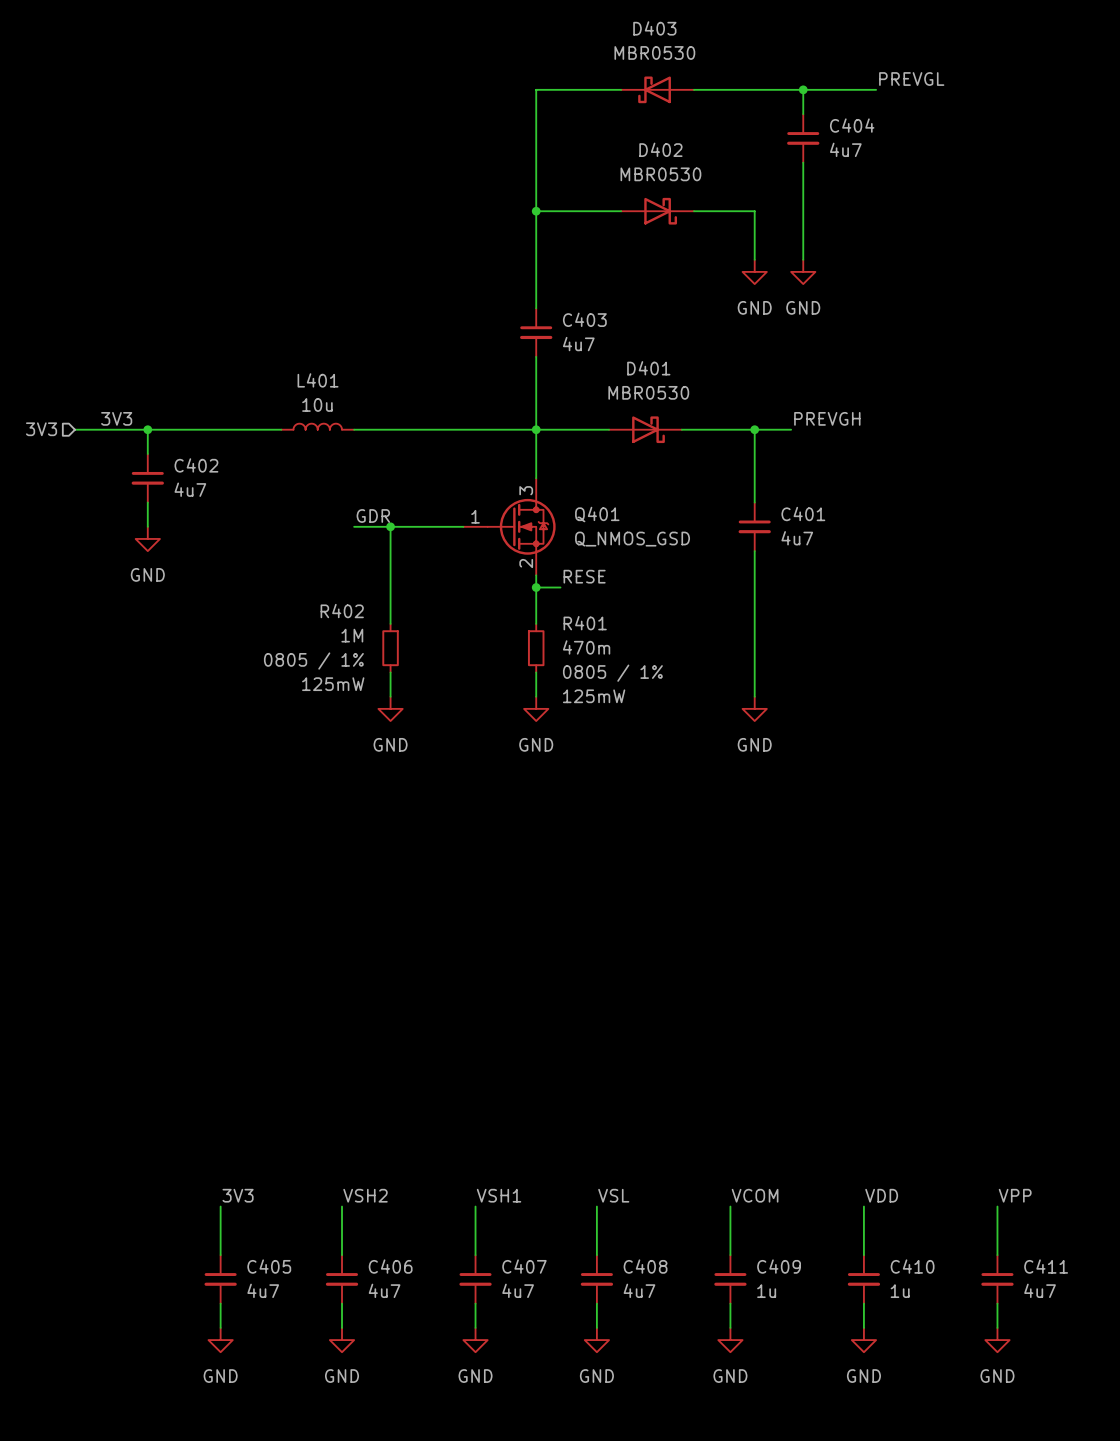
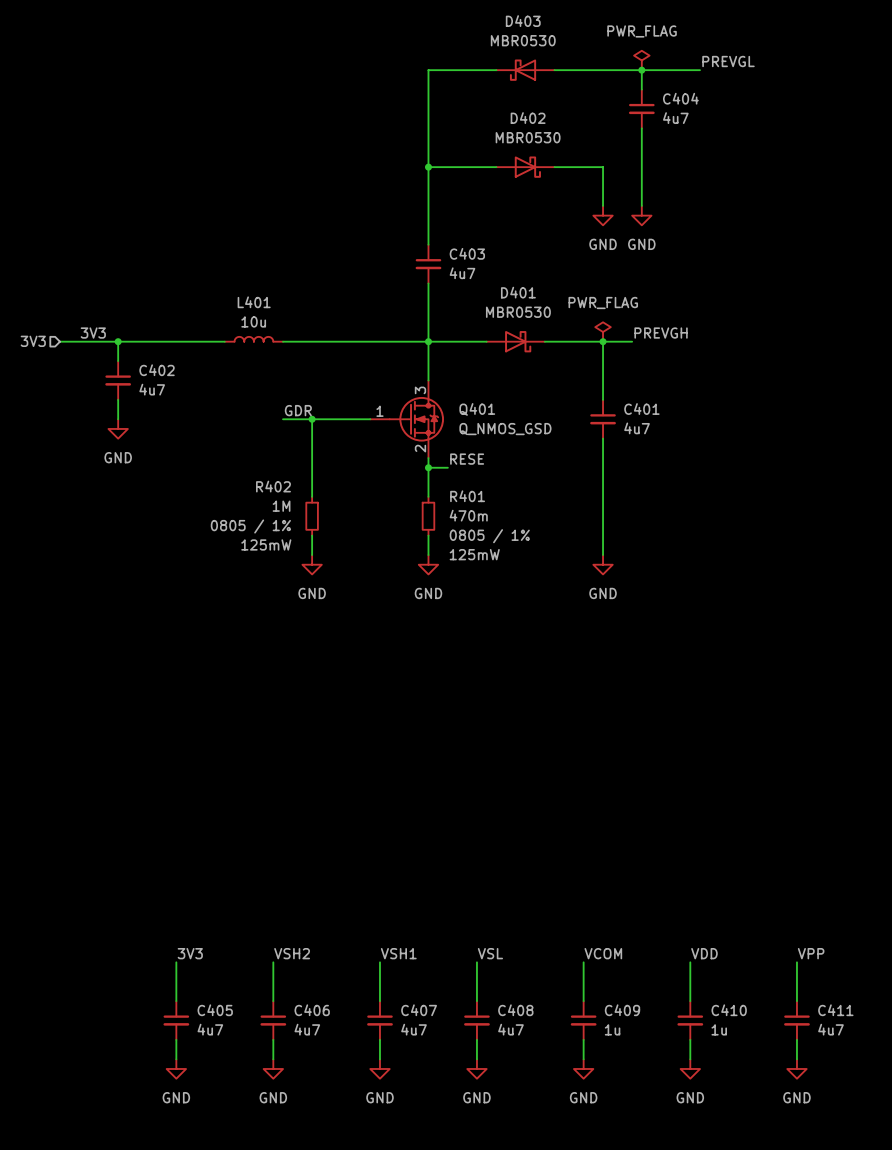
power symbol: none -> PWR_FLAG (641, 60)
power symbol: none -> PWR_FLAG (603, 331)

